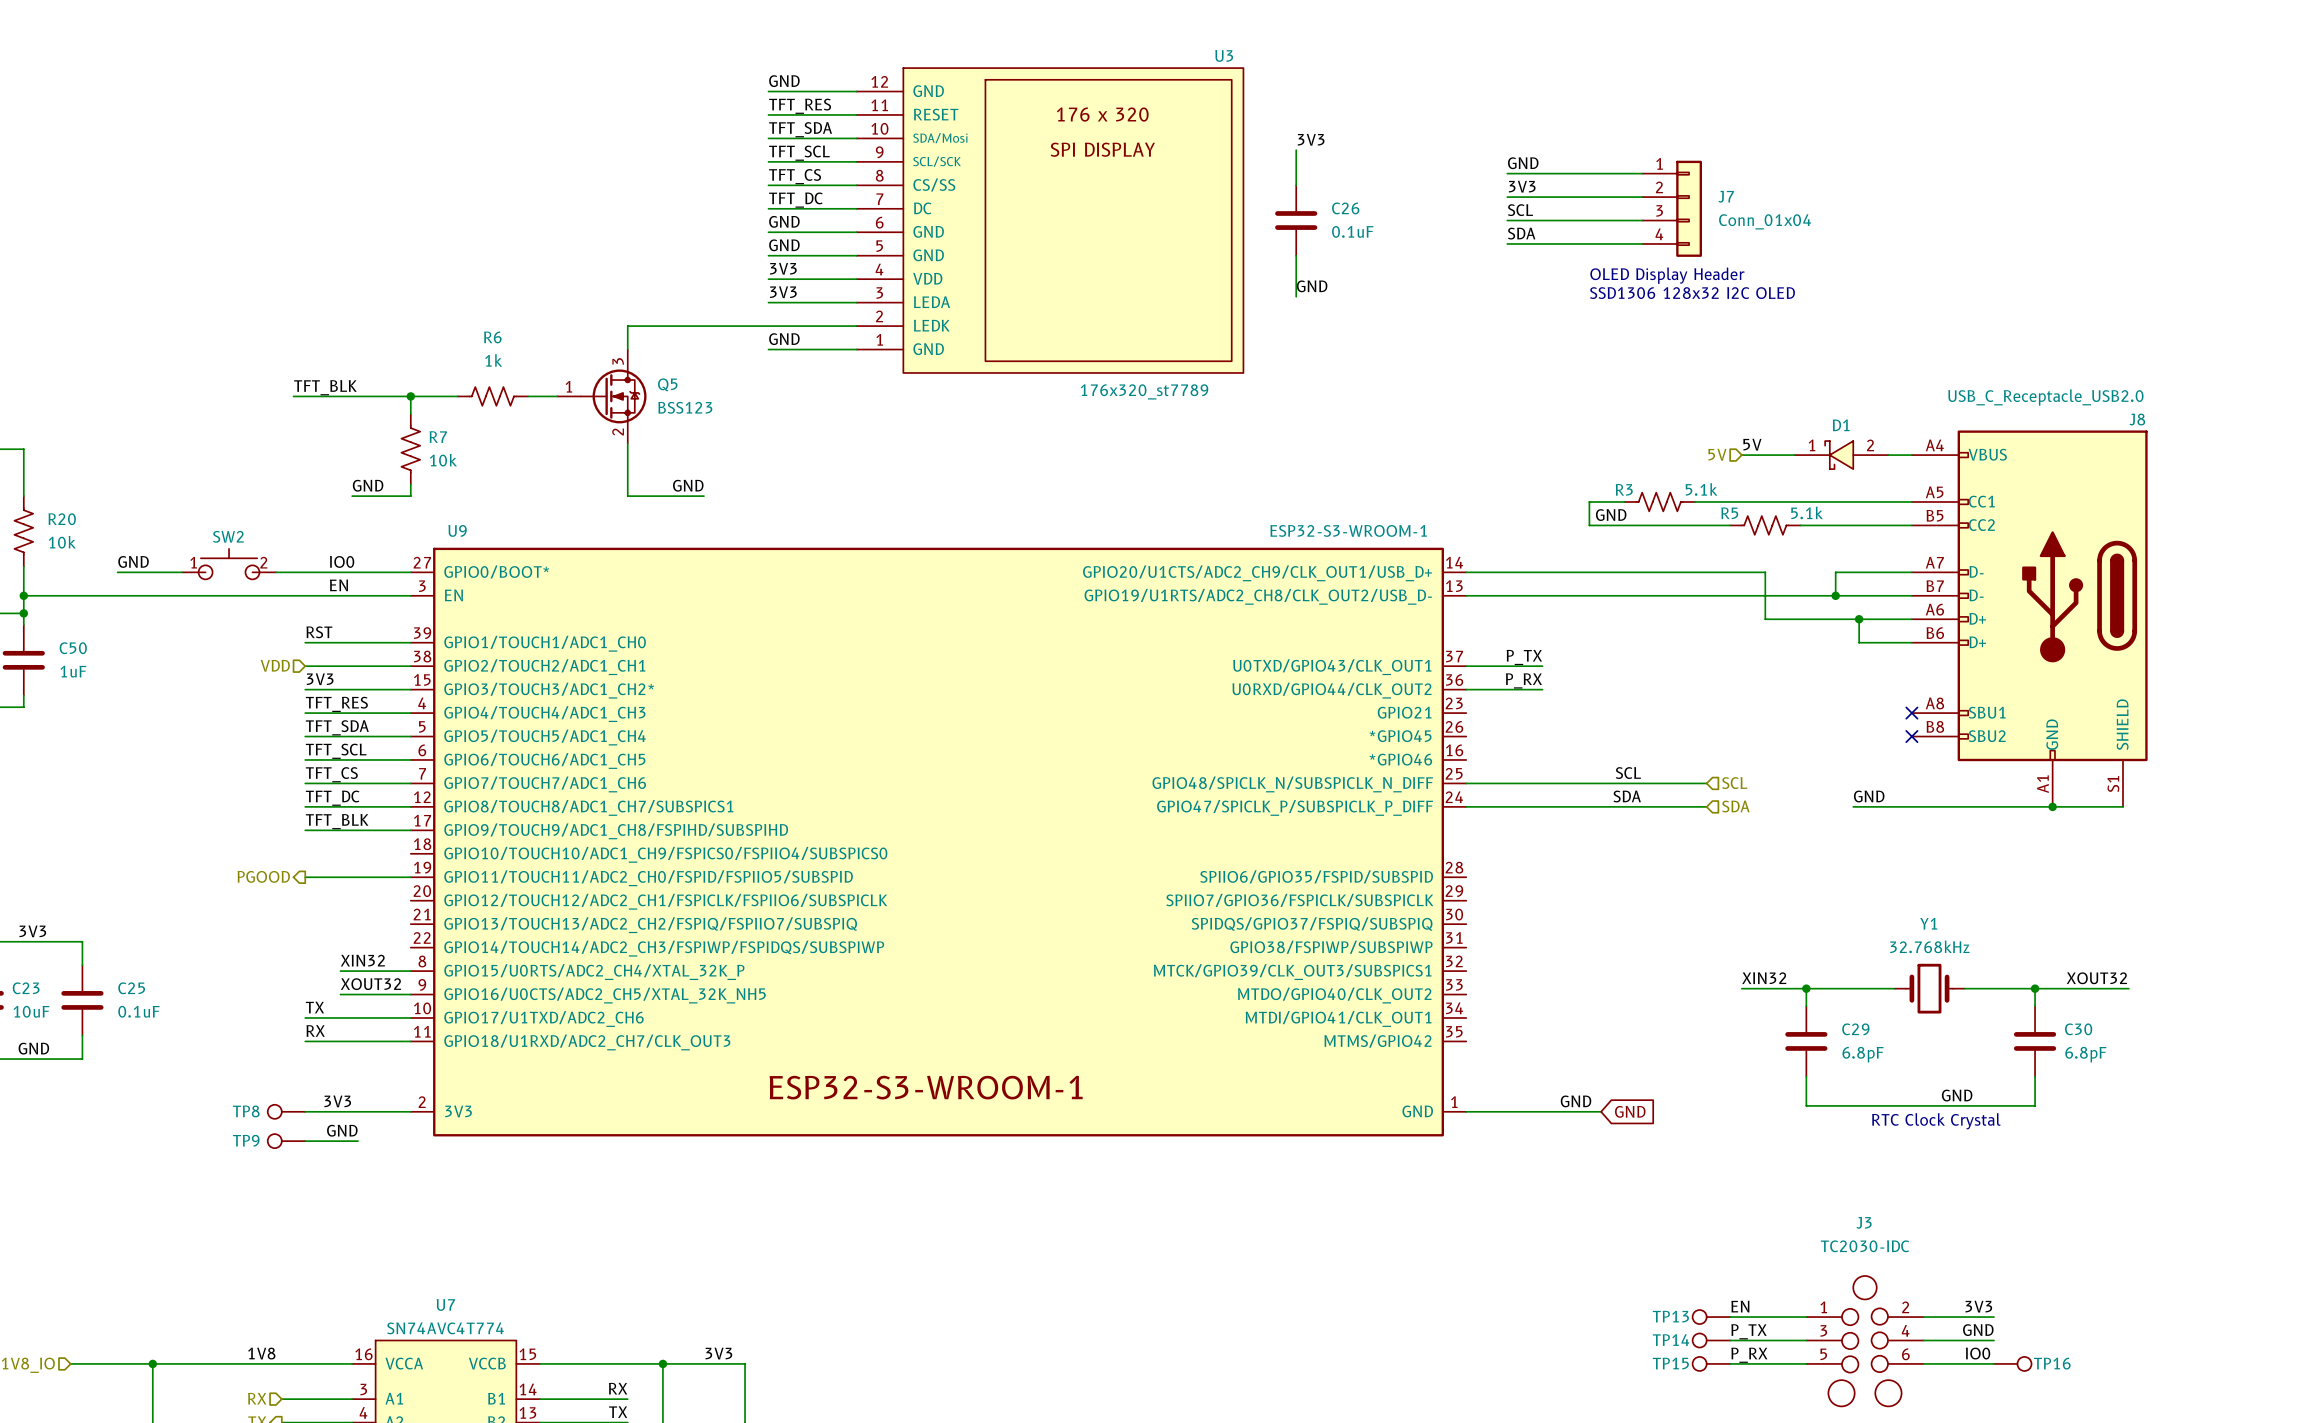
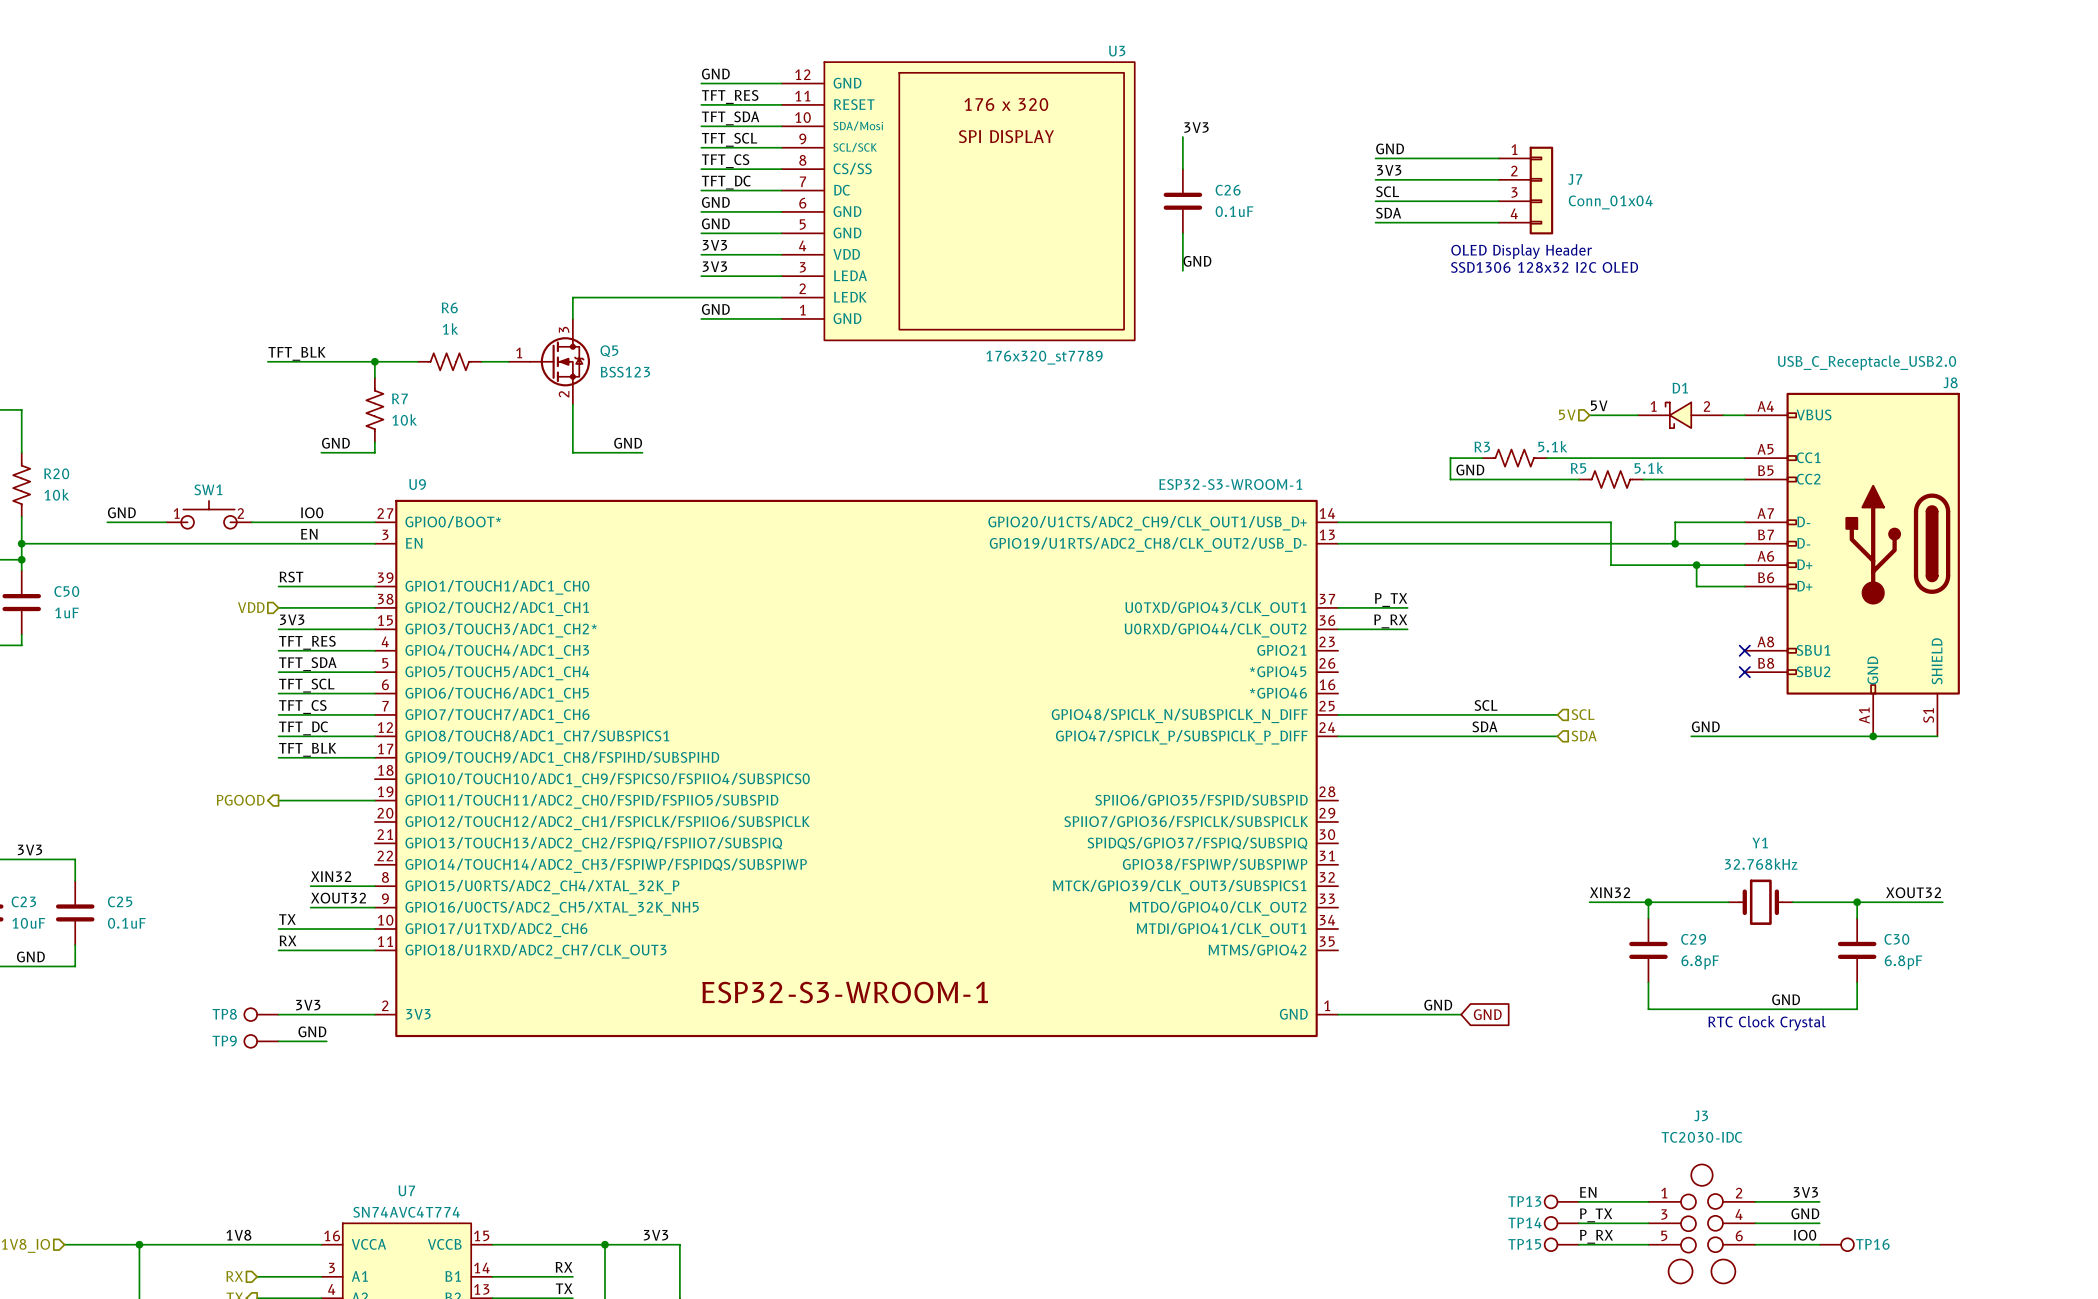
SW2 name: SW2 (228, 536) -> SW1 (208, 489)

